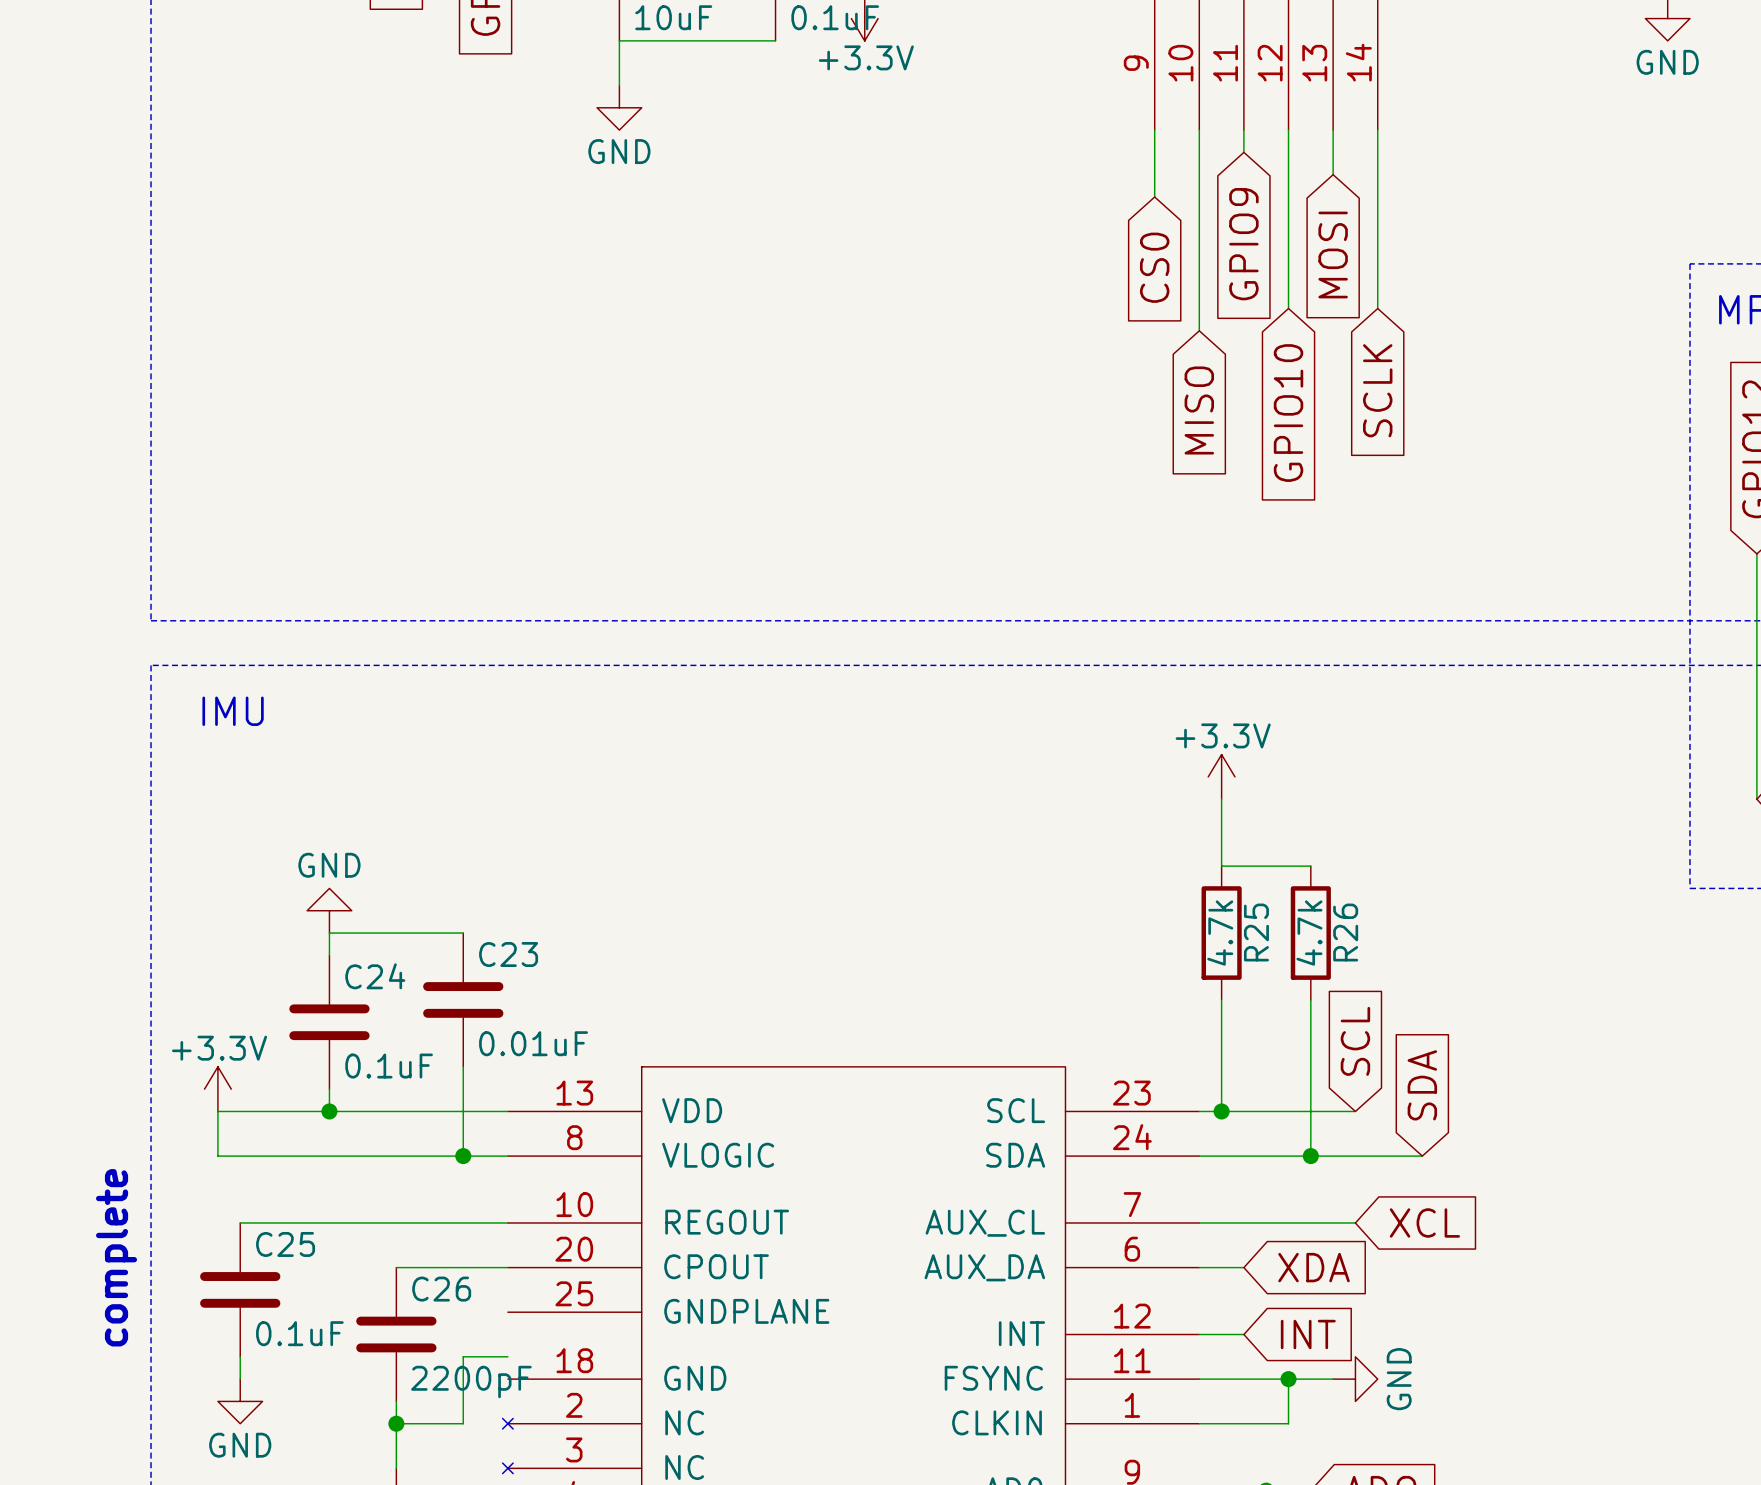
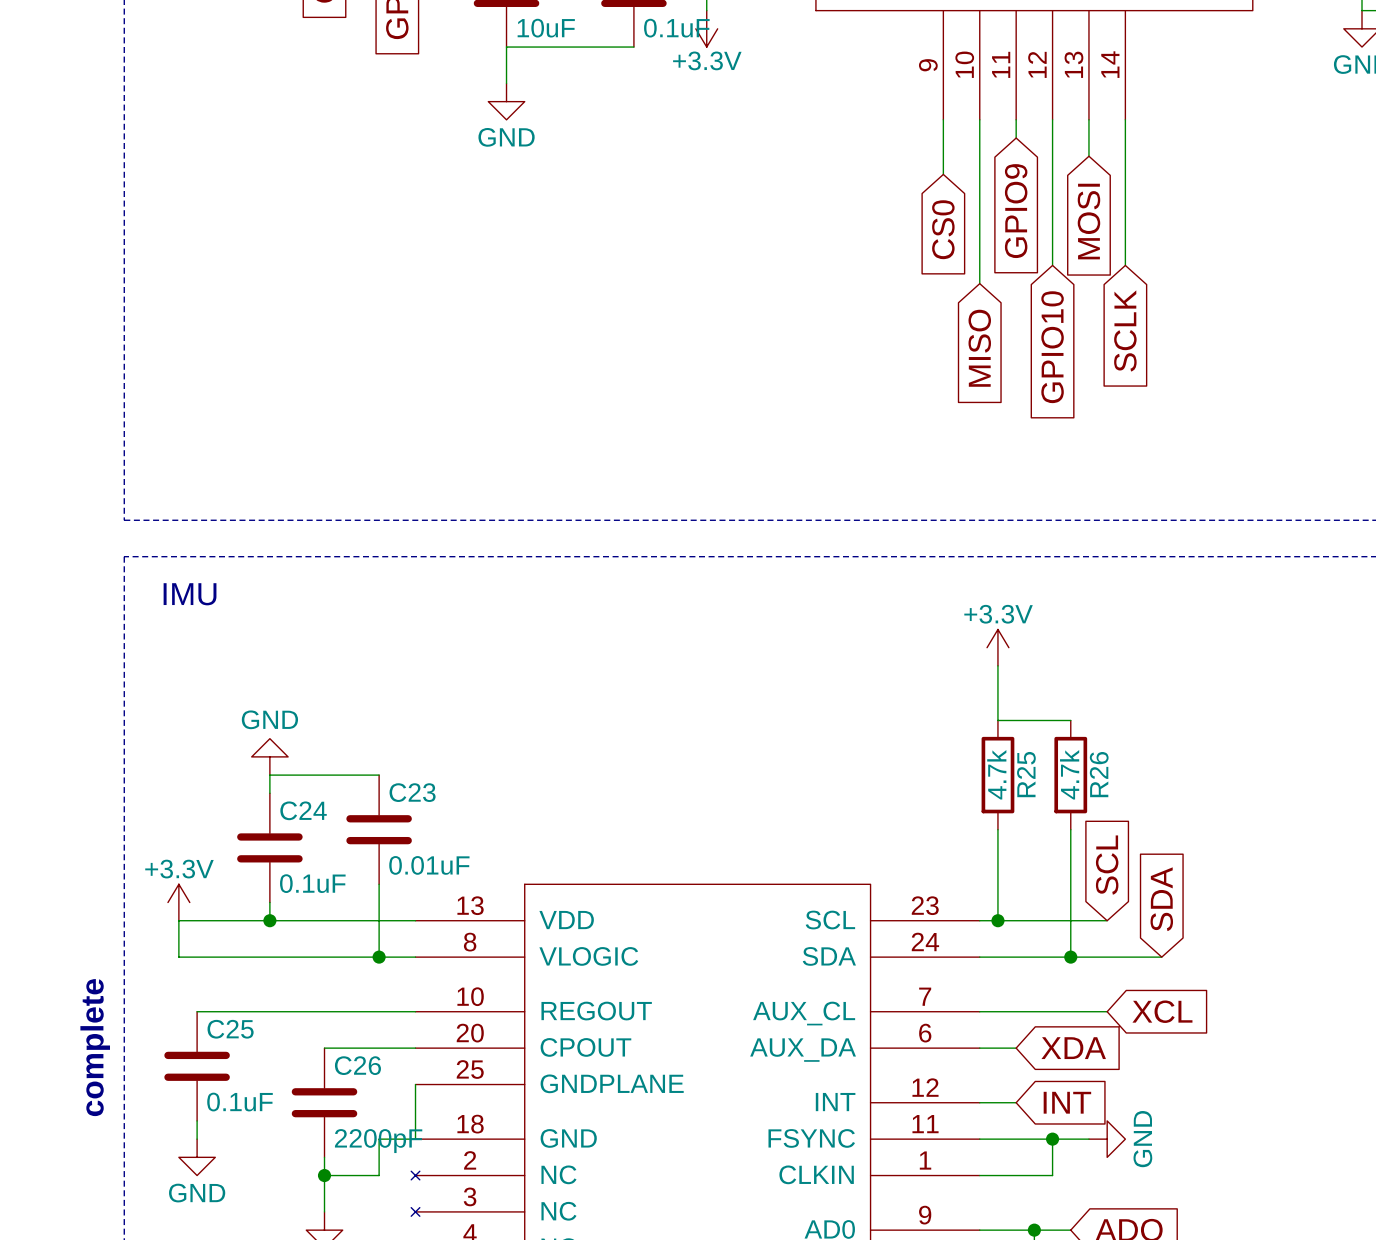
wire: (507, 1356) (463, 1356) (463, 1379) -> (415, 1084) (415, 1139) (379, 1139)

